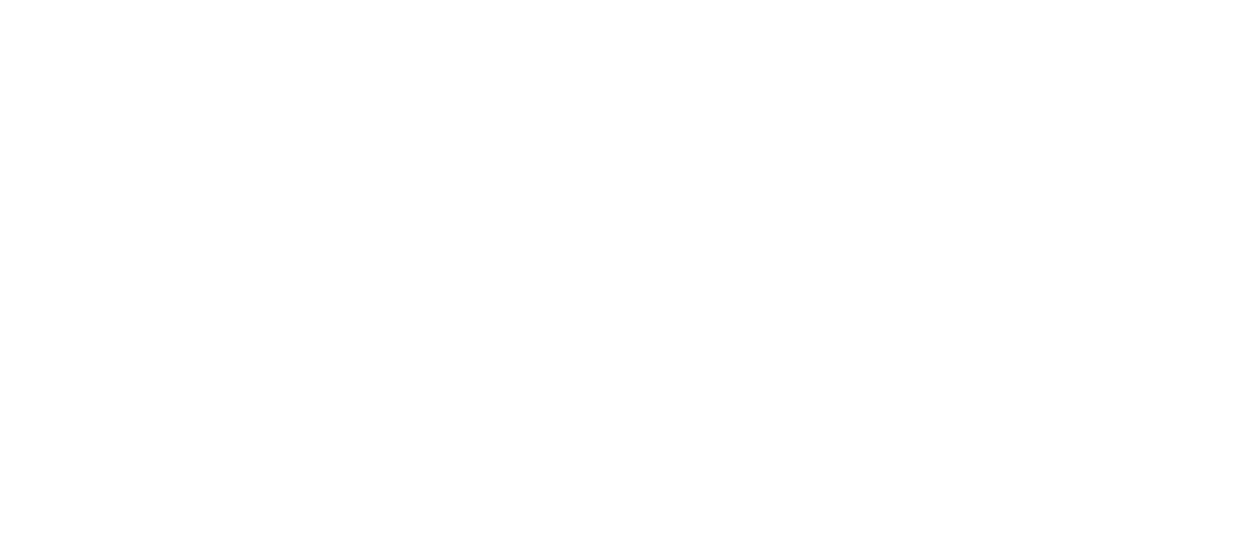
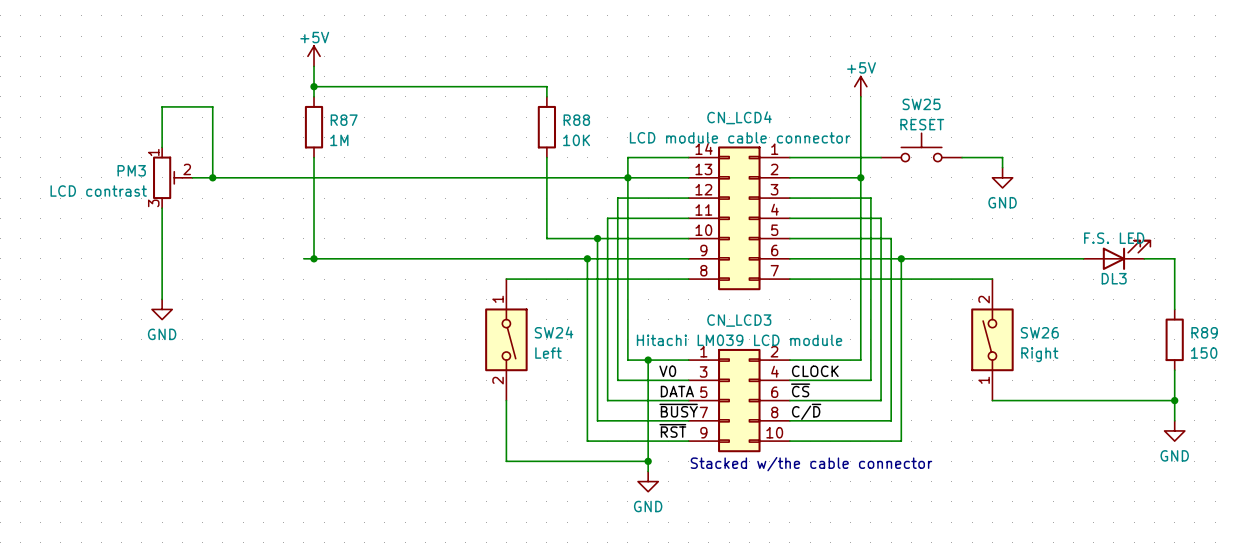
power symbol: none -> +5V (314, 56)
wire: none -> (314, 66) (314, 96)
wire: none -> (314, 86) (546, 86) (546, 96)
junction: none -> (314, 86)
power symbol: none -> +5V (860, 86)
wire: none -> (860, 96) (860, 360) (789, 360)
R87: none -> 1M (314, 127)
R88: none -> 10K (546, 127)
wire: none -> (162, 147) (162, 106) (212, 106) (212, 177)
SW25: none -> RESET (921, 147)
wire: none -> (314, 157) (314, 258)
wire: none -> (546, 157) (546, 238) (688, 238)
wire: none -> (688, 157) (627, 157) (627, 360) (688, 360)
wire: none -> (789, 157) (881, 157)
wire: none -> (962, 157) (1002, 157) (1002, 167)
PM3: none -> LCD contrast (172, 177)
wire: none -> (192, 177) (688, 177)
junction: none -> (212, 177)
junction: none -> (627, 177)
wire: none -> (789, 177) (860, 177)
junction: none -> (860, 177)
power symbol: none -> GND (1002, 177)
wire: none -> (688, 198) (617, 198) (617, 380) (688, 380)
wire: none -> (789, 198) (870, 198) (870, 380) (789, 380)
wire: none -> (162, 208) (162, 299)
wire: none -> (688, 218) (607, 218) (607, 400) (688, 400)
CN_LCD4: none -> LCD module cable connector (739, 218)
wire: none -> (789, 218) (881, 218) (881, 400) (789, 400)
wire: none -> (597, 238) (597, 420) (688, 420)
junction: none -> (597, 238)
wire: none -> (789, 238) (891, 238) (891, 420) (789, 420)
DL3: none -> F.S. LED (1116, 255)
wire: none -> (303, 258) (688, 258)
junction: none -> (314, 258)
wire: none -> (587, 258) (587, 441) (688, 441)
junction: none -> (587, 258)
wire: none -> (789, 258) (1083, 258)
wire: none -> (901, 258) (901, 441) (789, 441)
junction: none -> (901, 258)
wire: none -> (1144, 258) (1174, 258) (1174, 309)
wire: none -> (506, 279) (688, 279)
wire: none -> (789, 279) (992, 279)
power symbol: none -> GND (162, 309)
SW24: none -> Left (506, 339)
SW26: none -> Right (992, 339)
R89: none -> 150 (1174, 339)
wire: none -> (648, 360) (648, 471)
junction: none -> (648, 360)
wire: none -> (1174, 370) (1174, 420)
label: none -> V0 (667, 371)
label: none -> CLOCK (815, 371)
label: none -> ~{CS} (800, 390)
label: none -> DATA (677, 391)
wire: none -> (506, 400) (506, 461) (648, 461)
CN_LCD3: none -> Hitachi LM039 LCD module (739, 400)
wire: none -> (992, 400) (1174, 400)
junction: none -> (1174, 400)
label: none -> ~{BUSY} (678, 410)
label: none -> C/~{D} (806, 411)
label: none -> ~{RST} (672, 430)
power symbol: none -> GND (1174, 430)
junction: none -> (648, 461)
text: none -> Stacked w/the cable connector (811, 464)
power symbol: none -> GND (648, 481)

